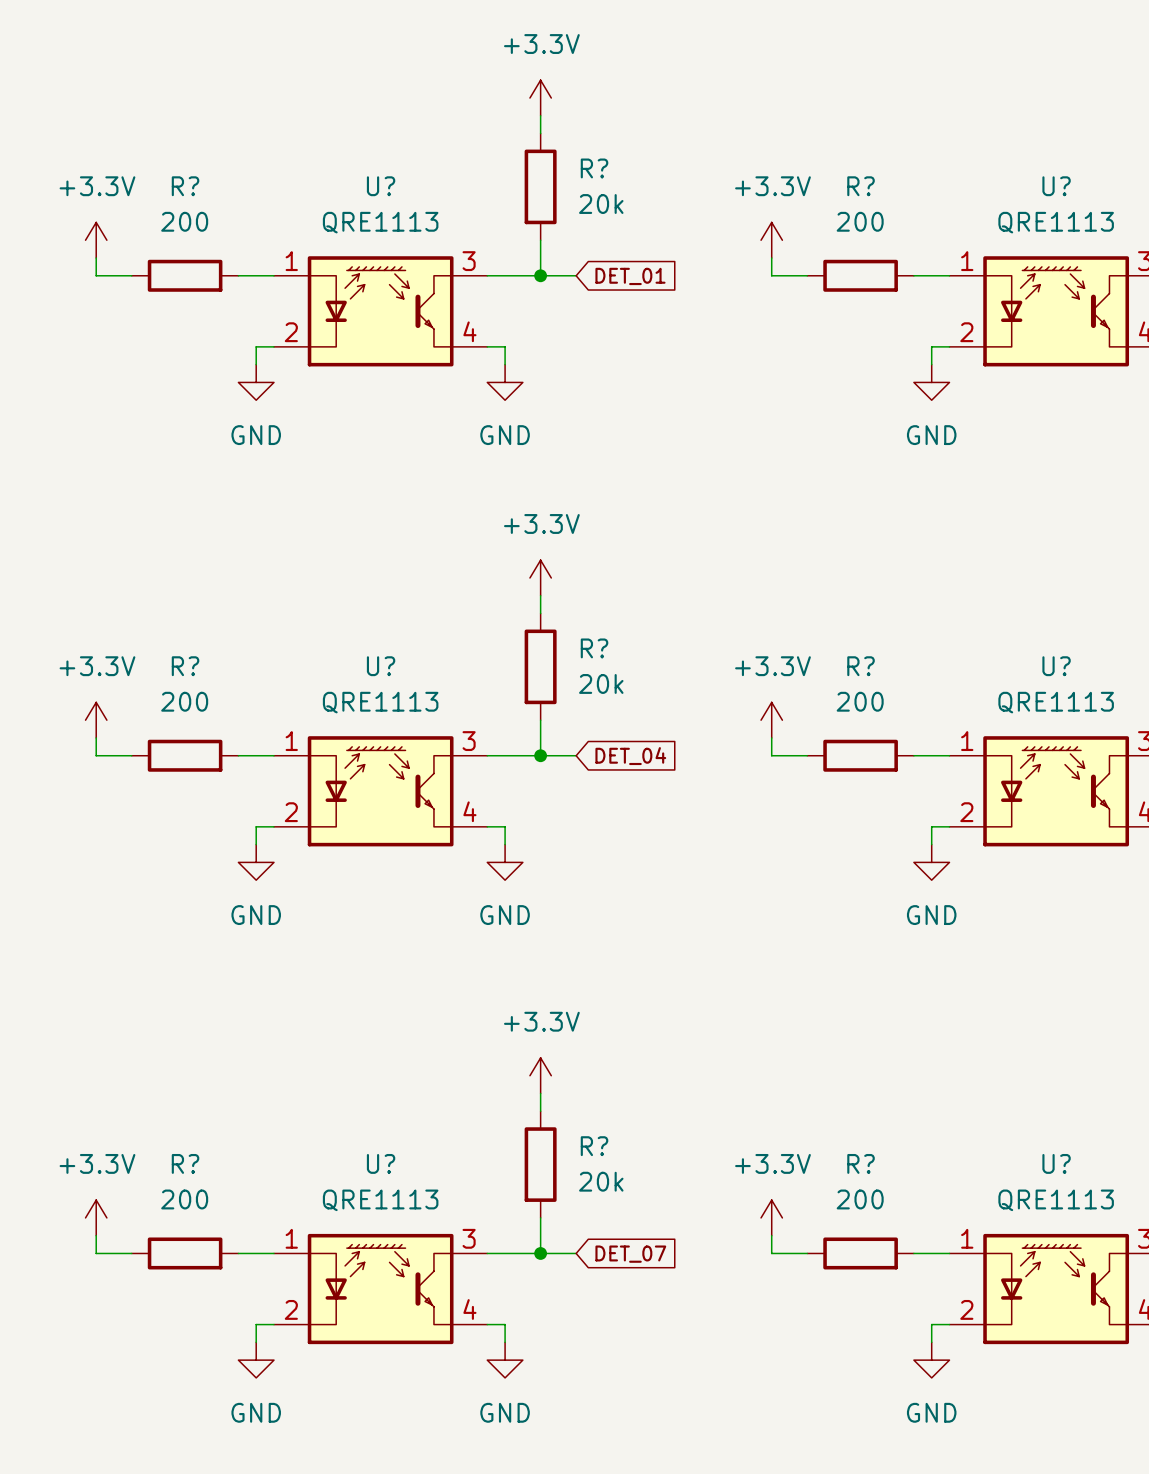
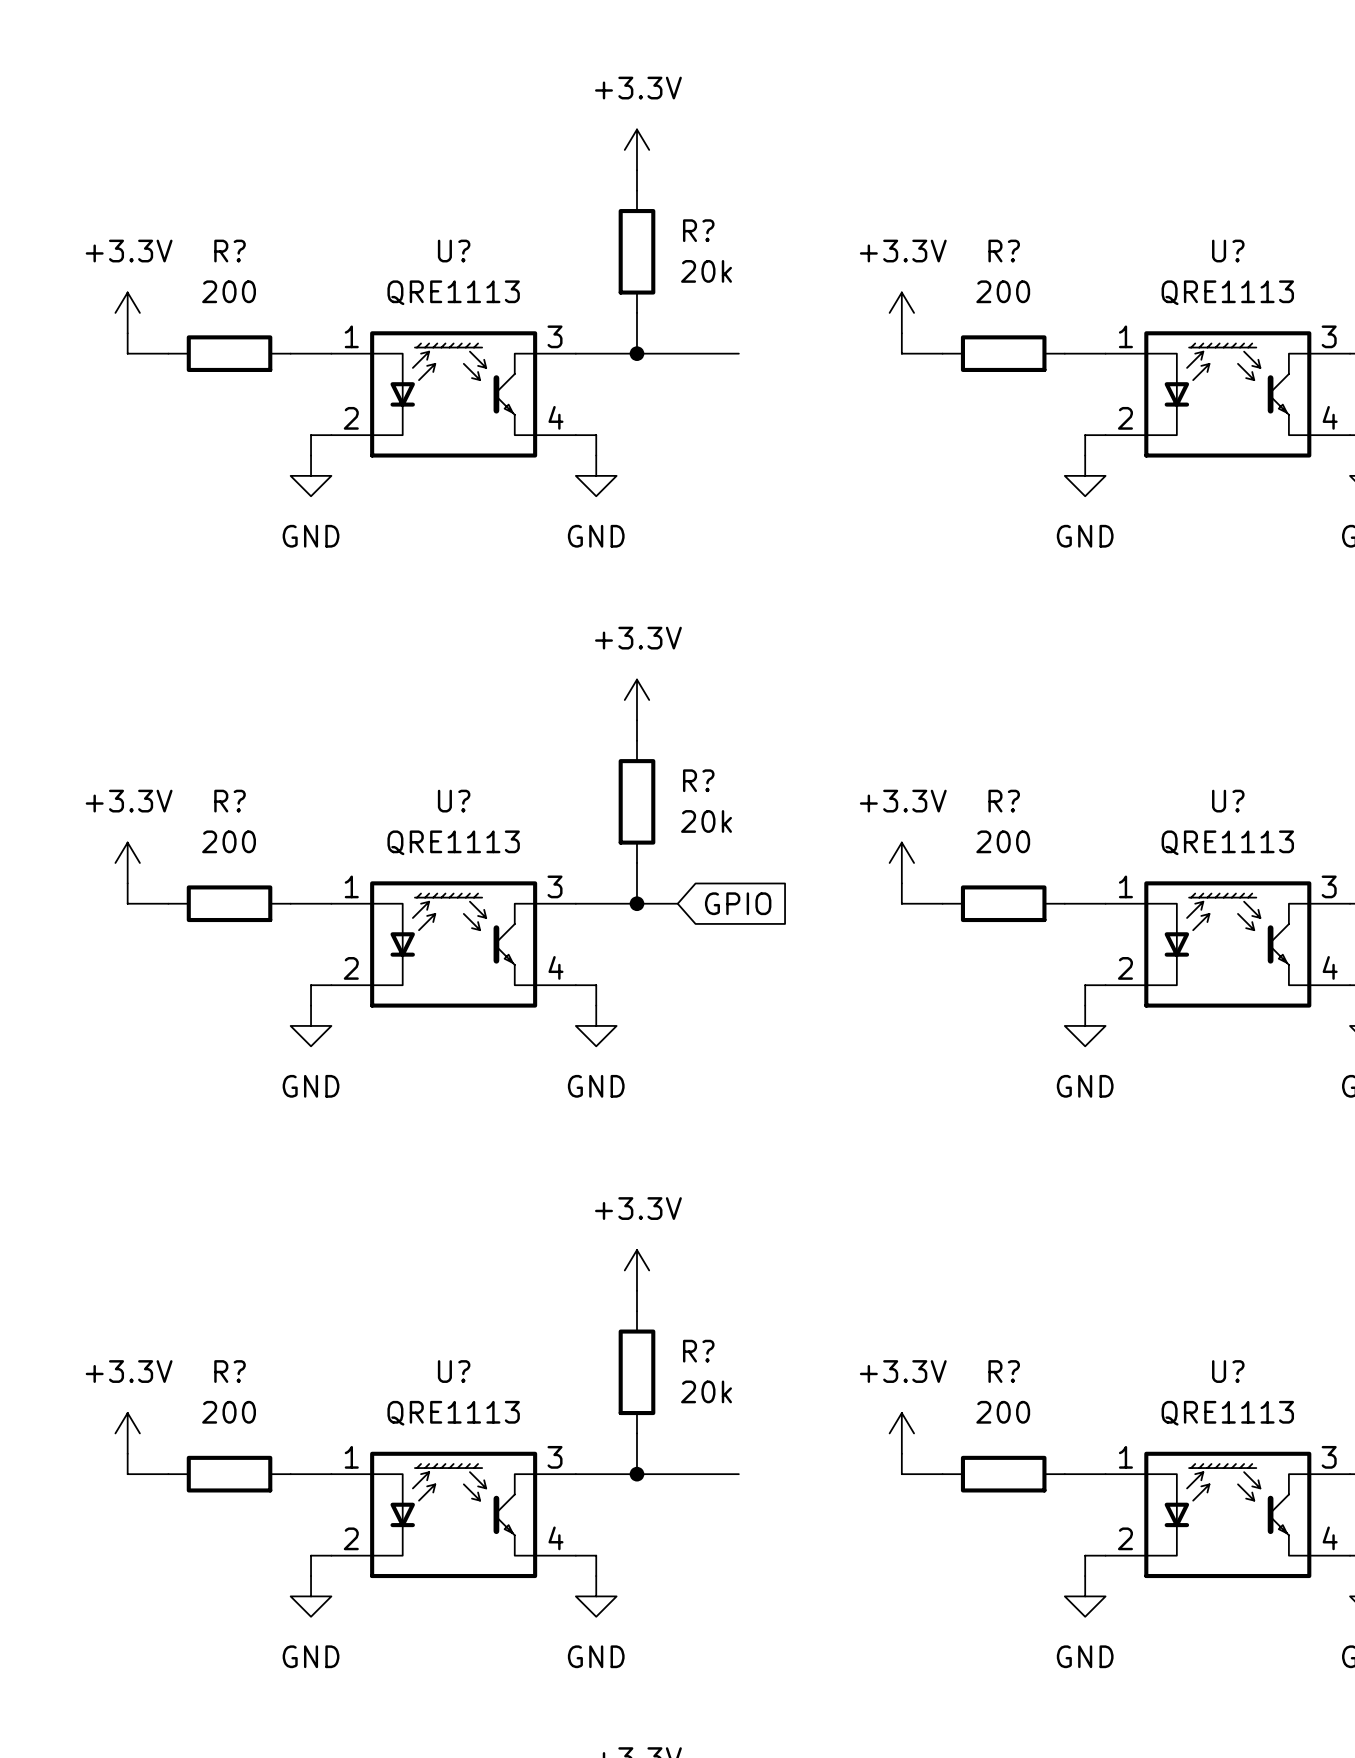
wire: none -> (677, 353) (738, 353)
global label: DET_01 (630, 276) -> none
global label: DET_04 (630, 756) -> GPIO (738, 903)
wire: none -> (677, 1474) (738, 1474)
global label: DET_07 (630, 1254) -> none

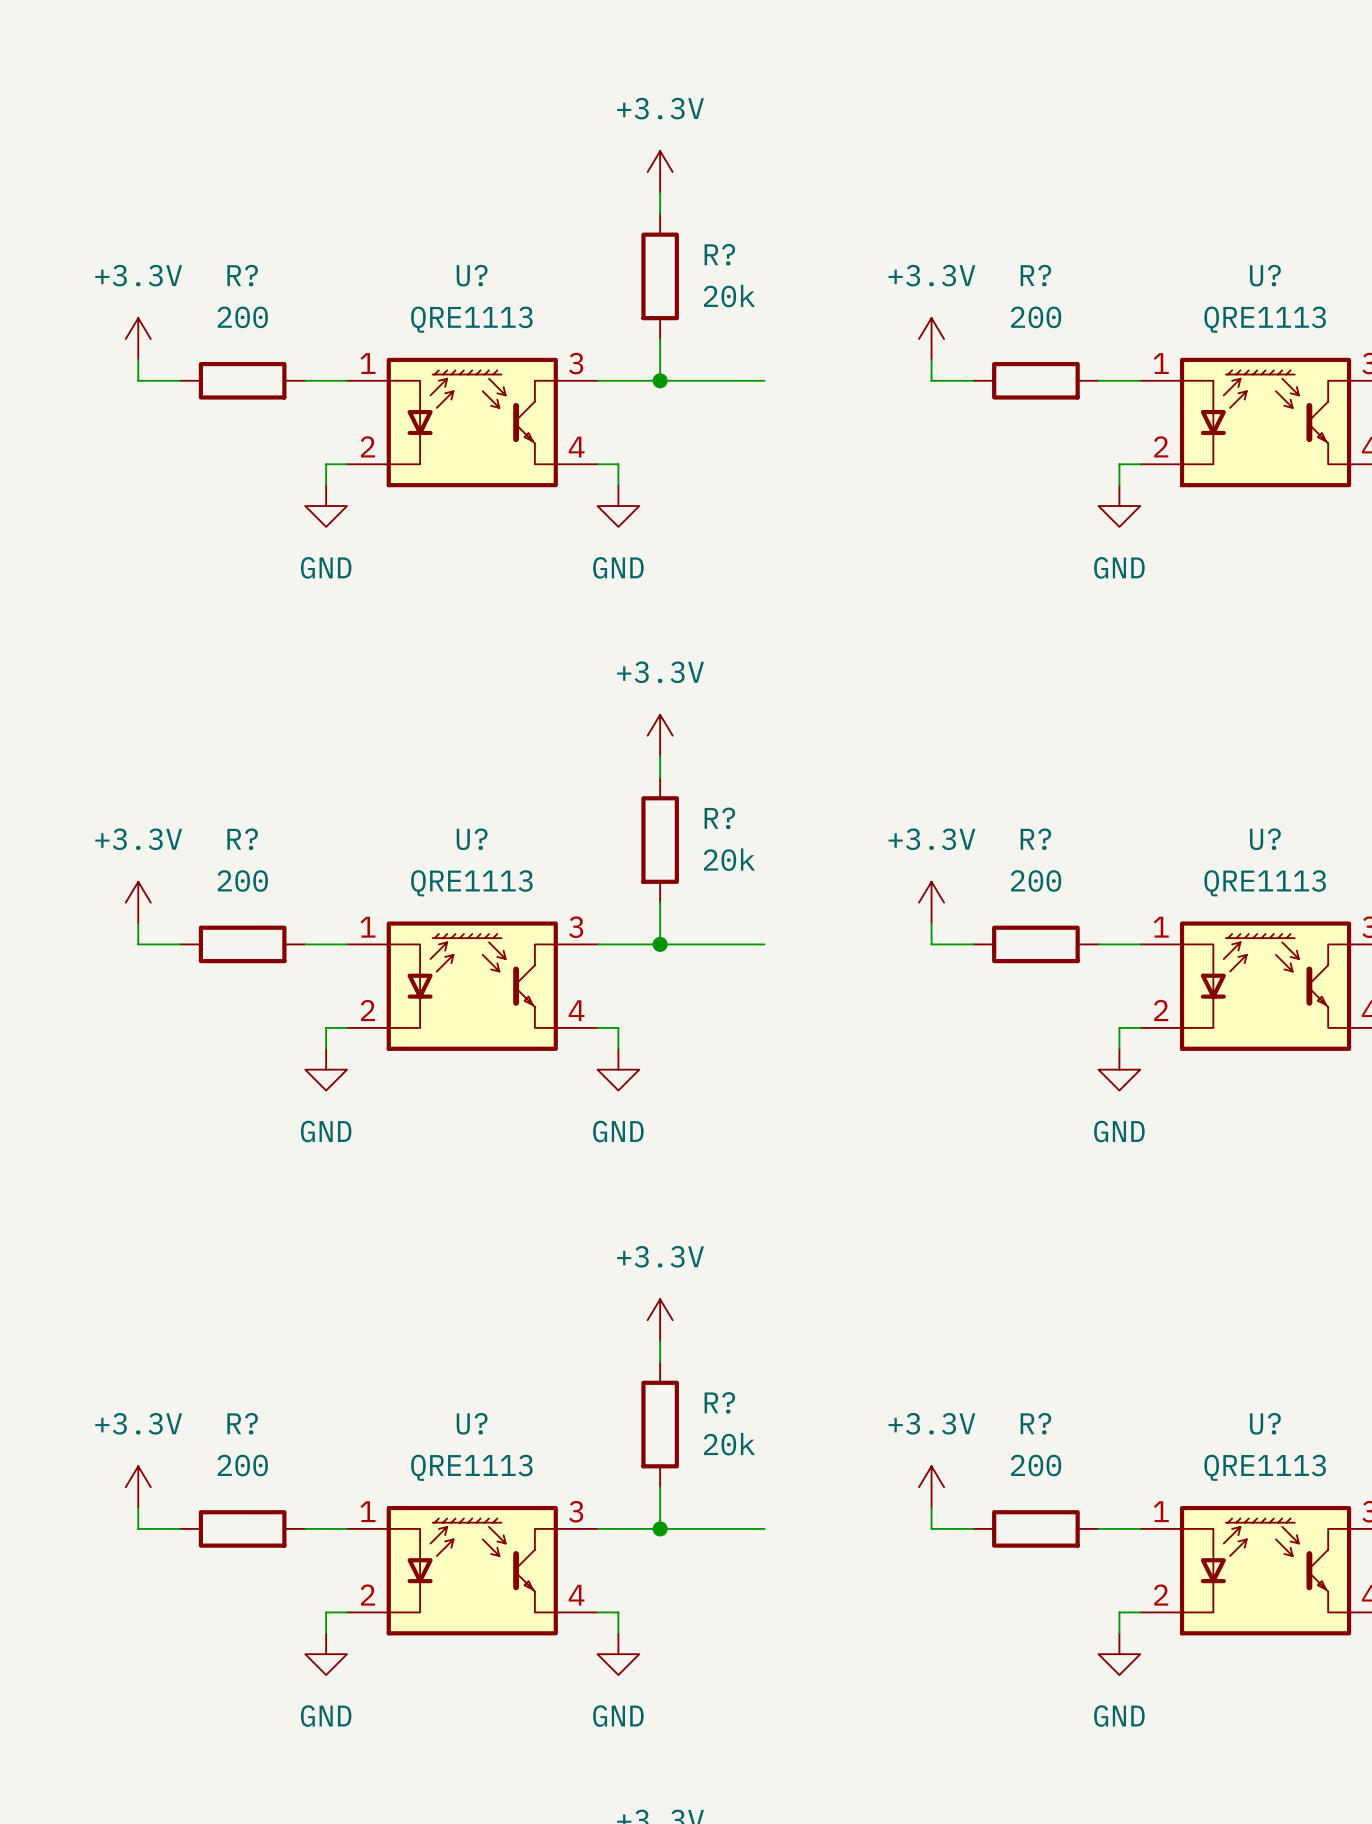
wire: none -> (701, 944) (764, 944)
global label: GPIO (738, 903) -> none

